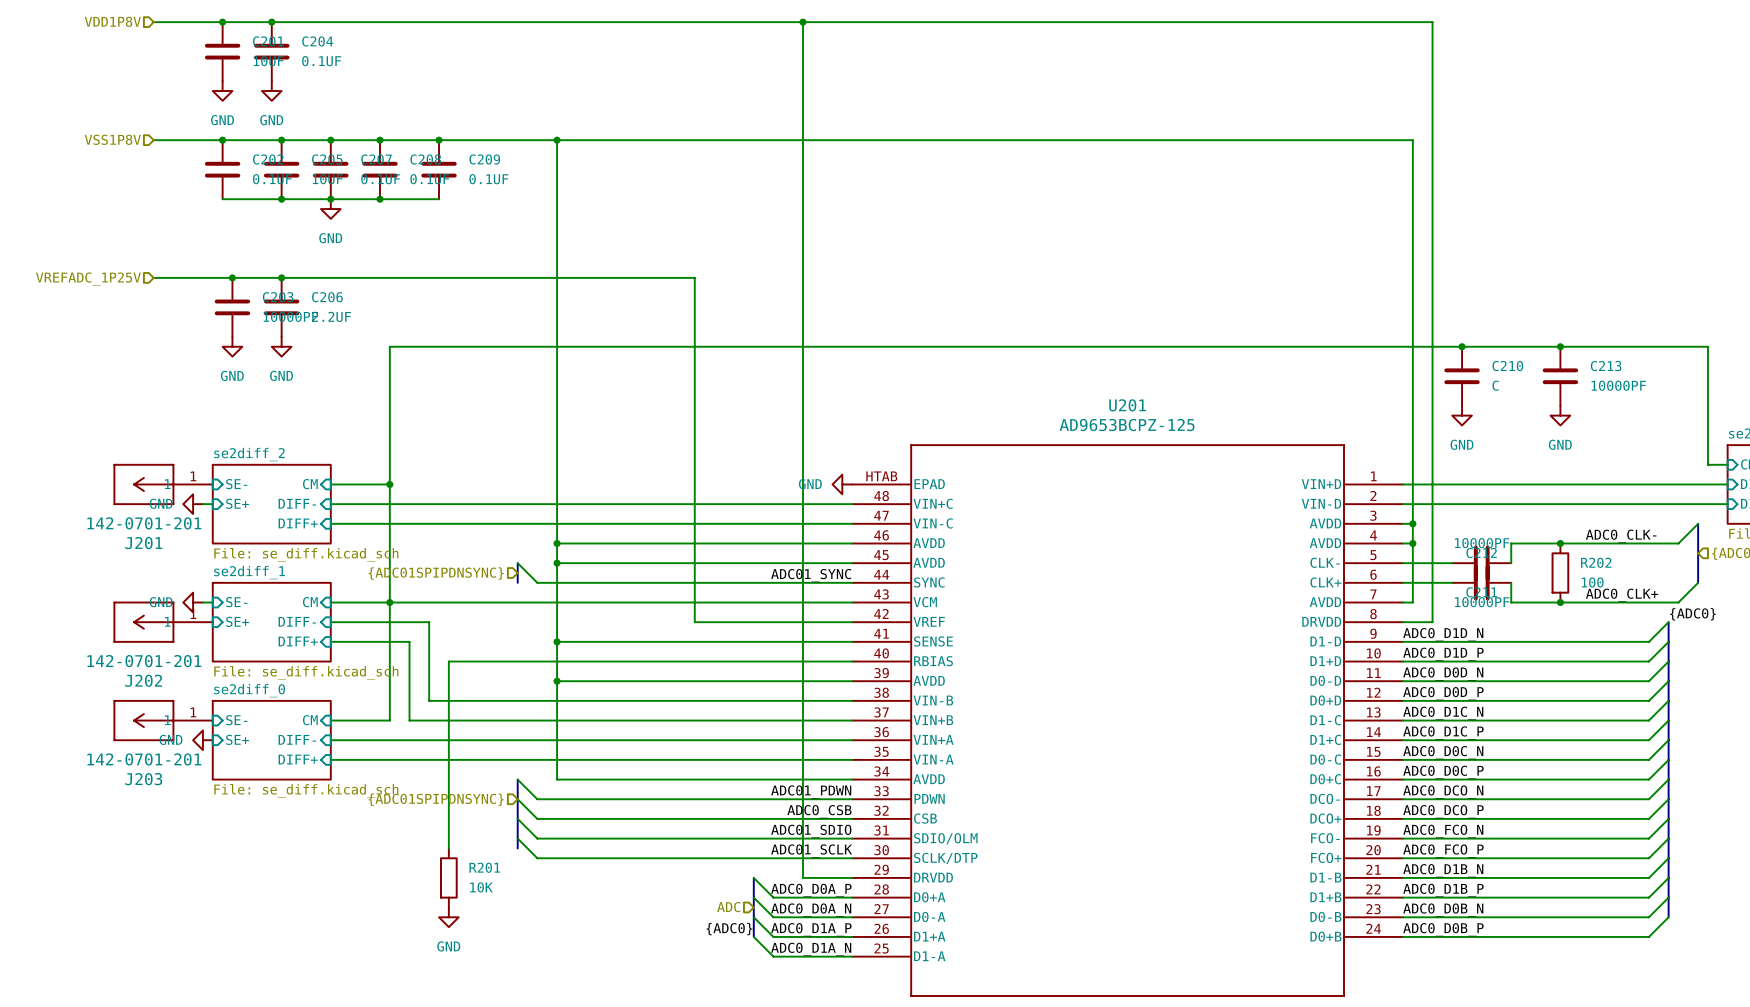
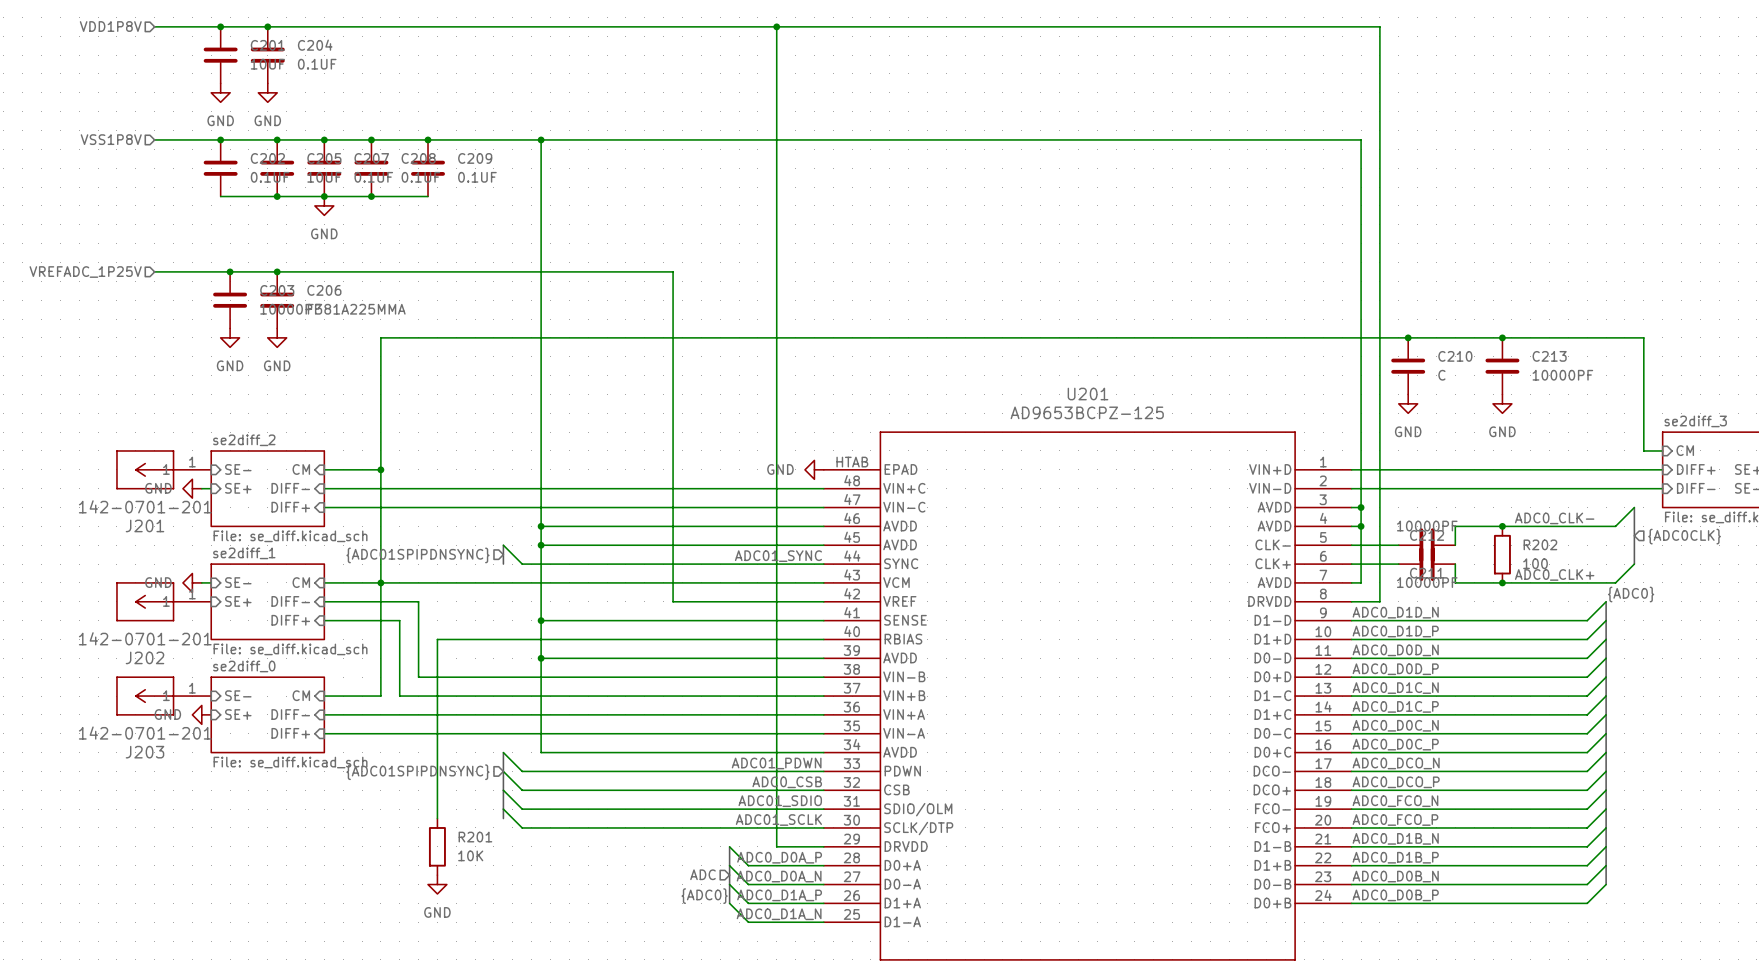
C206 value: 2.2UF (331, 316) -> F381A225MMA (356, 309)

